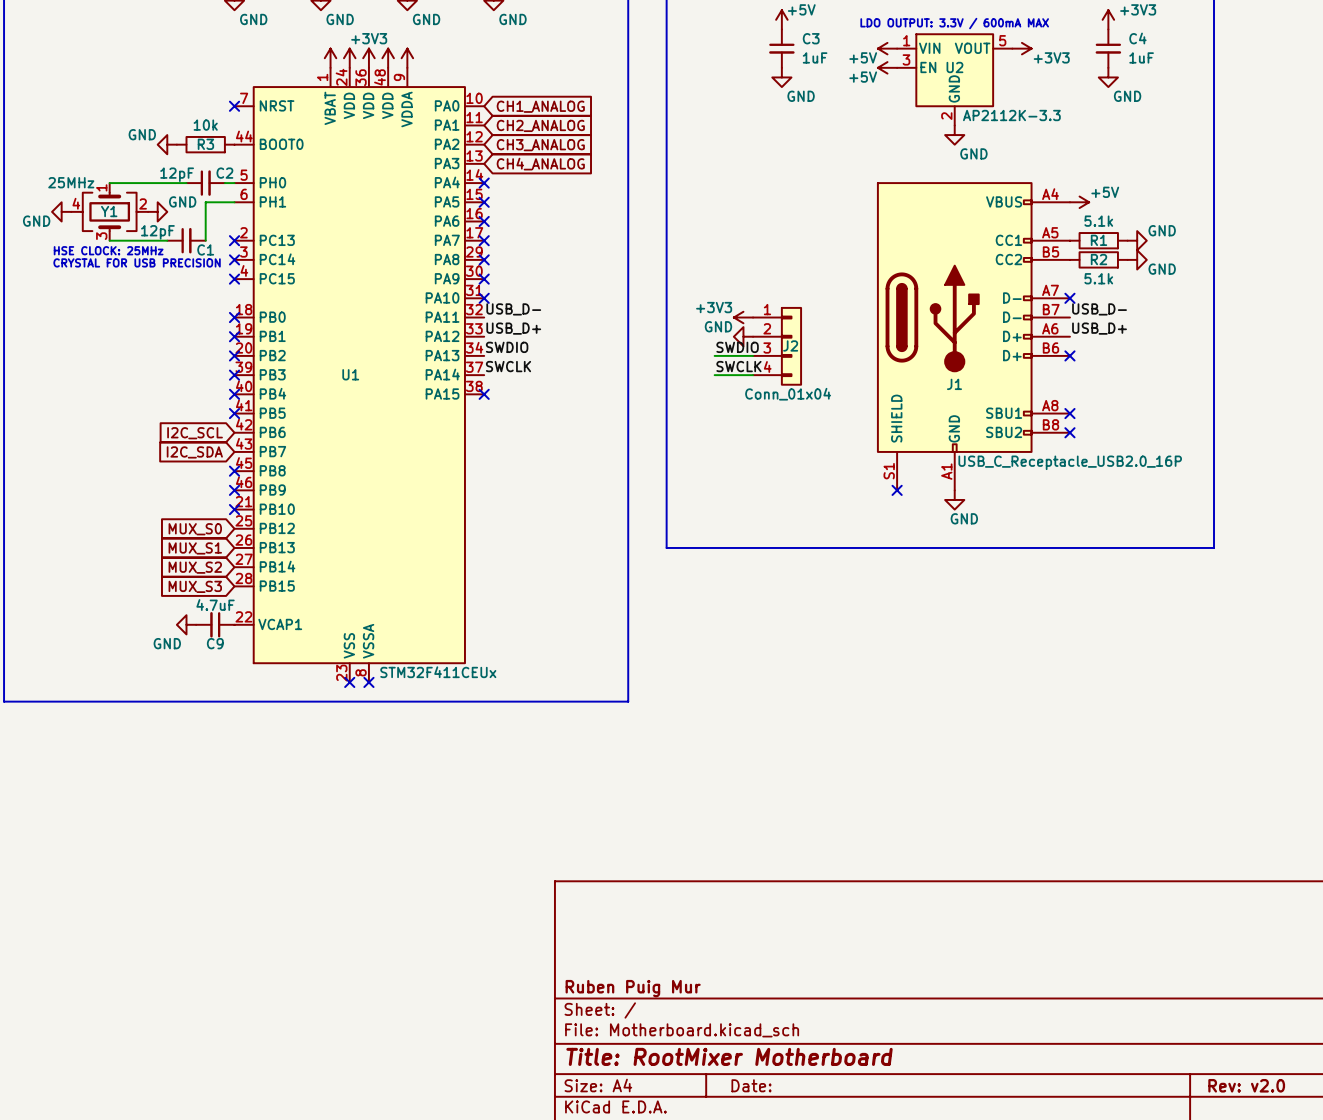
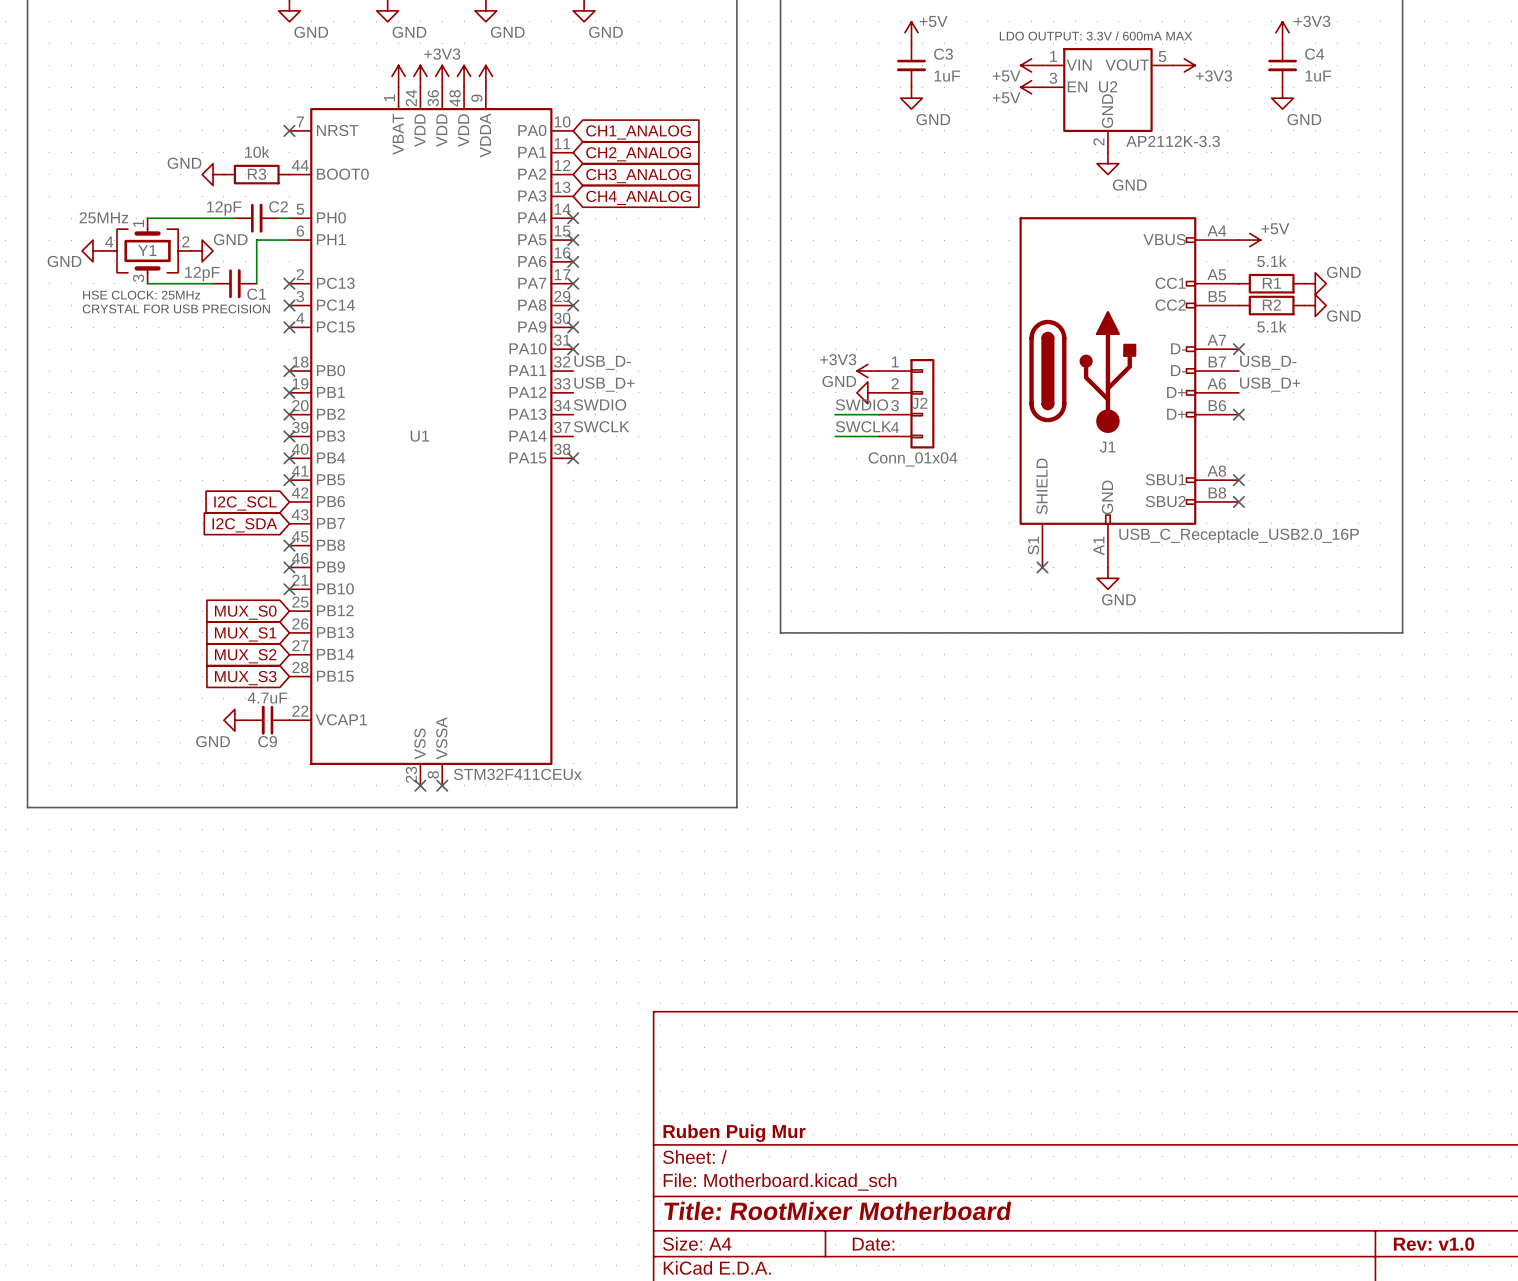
title block: Rev: v2.0 (1246, 1085) -> Rev: v1.0 (1434, 1244)

